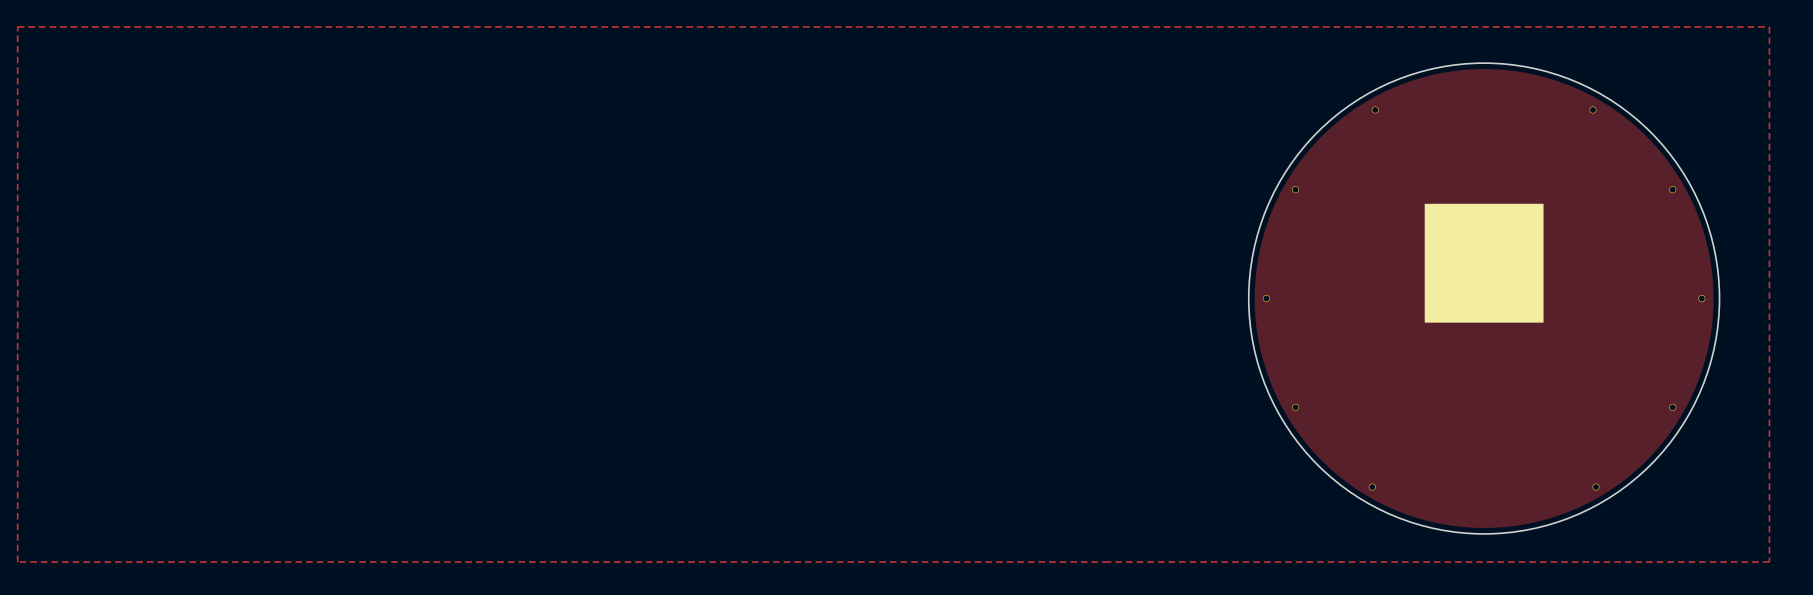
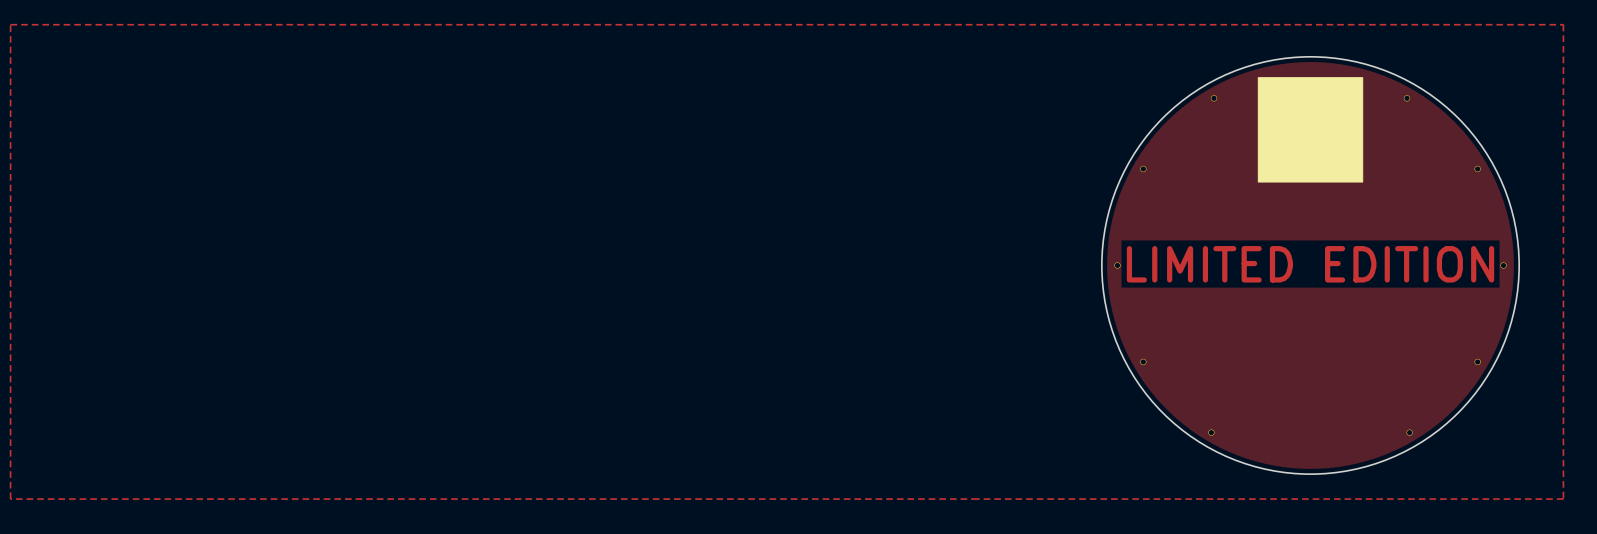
drawing position: (1484, 263) -> (1310, 129)
text: none -> LIMITED EDITION (1310, 264)

